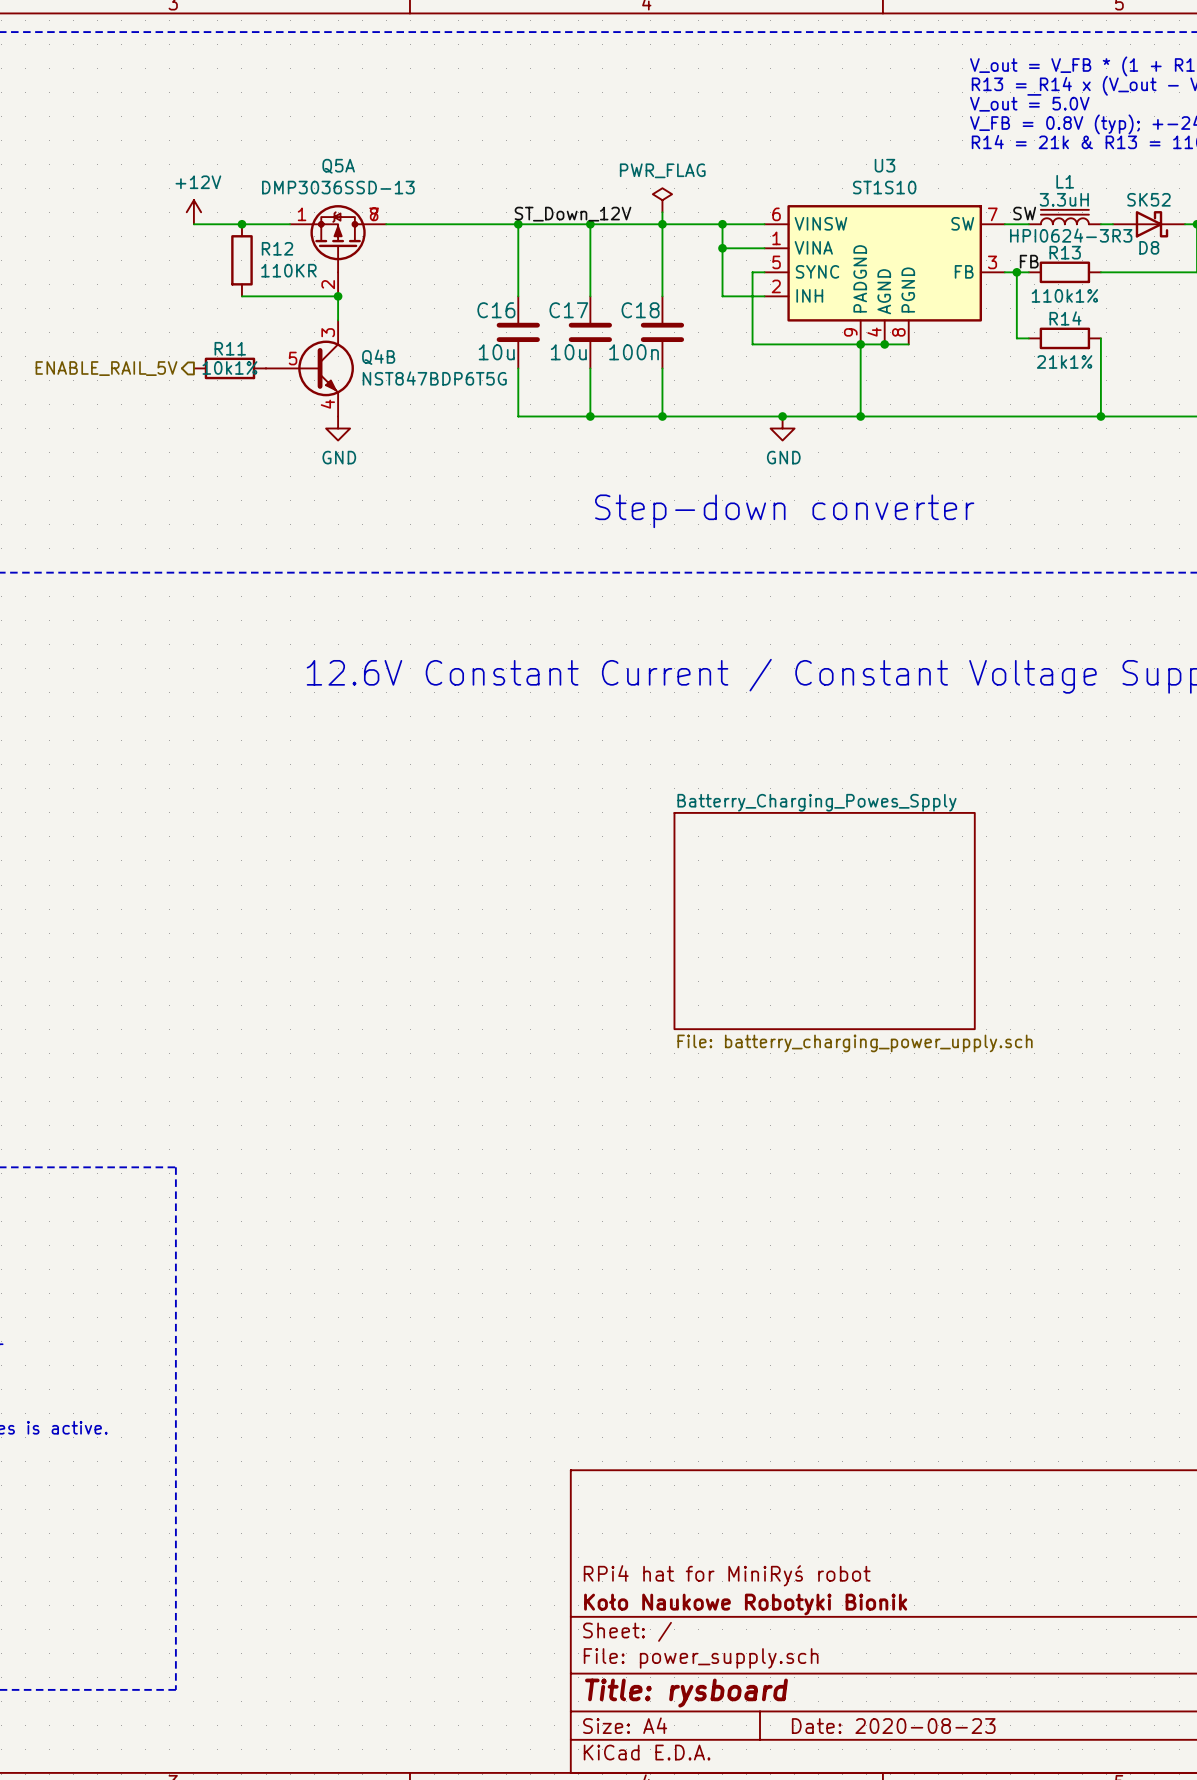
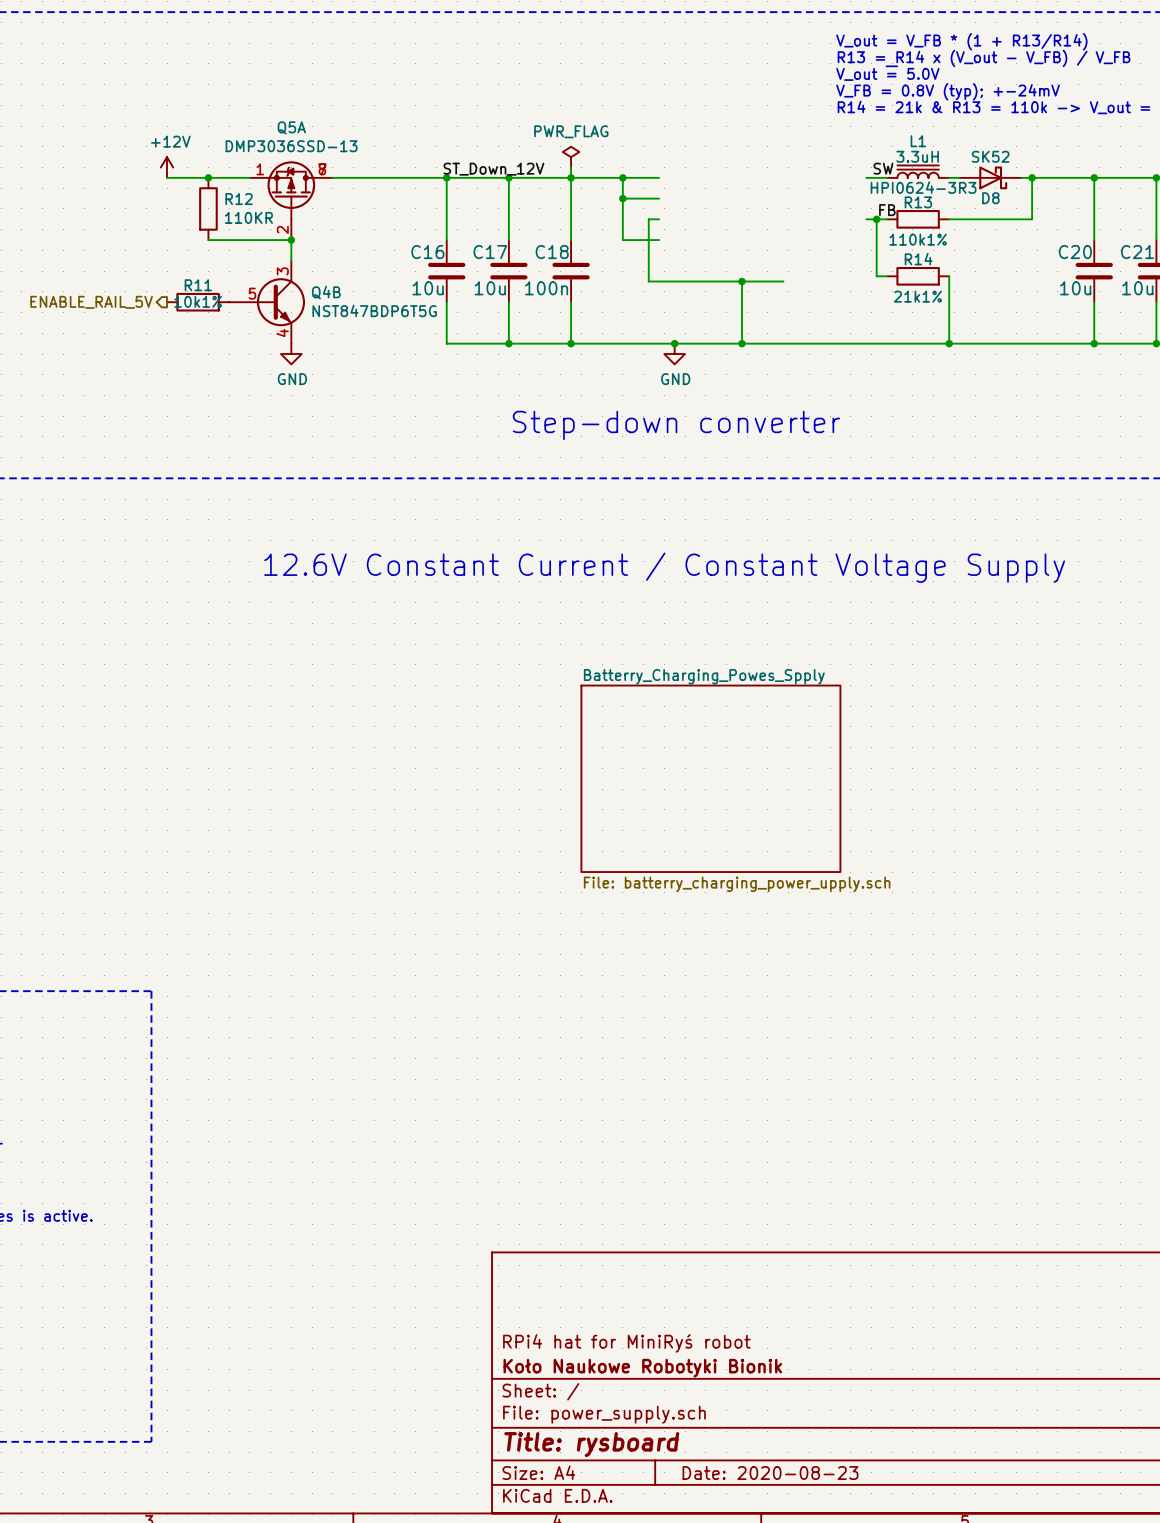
U3: ST1S10 (884, 274) -> none
junction: (884, 344) -> none

